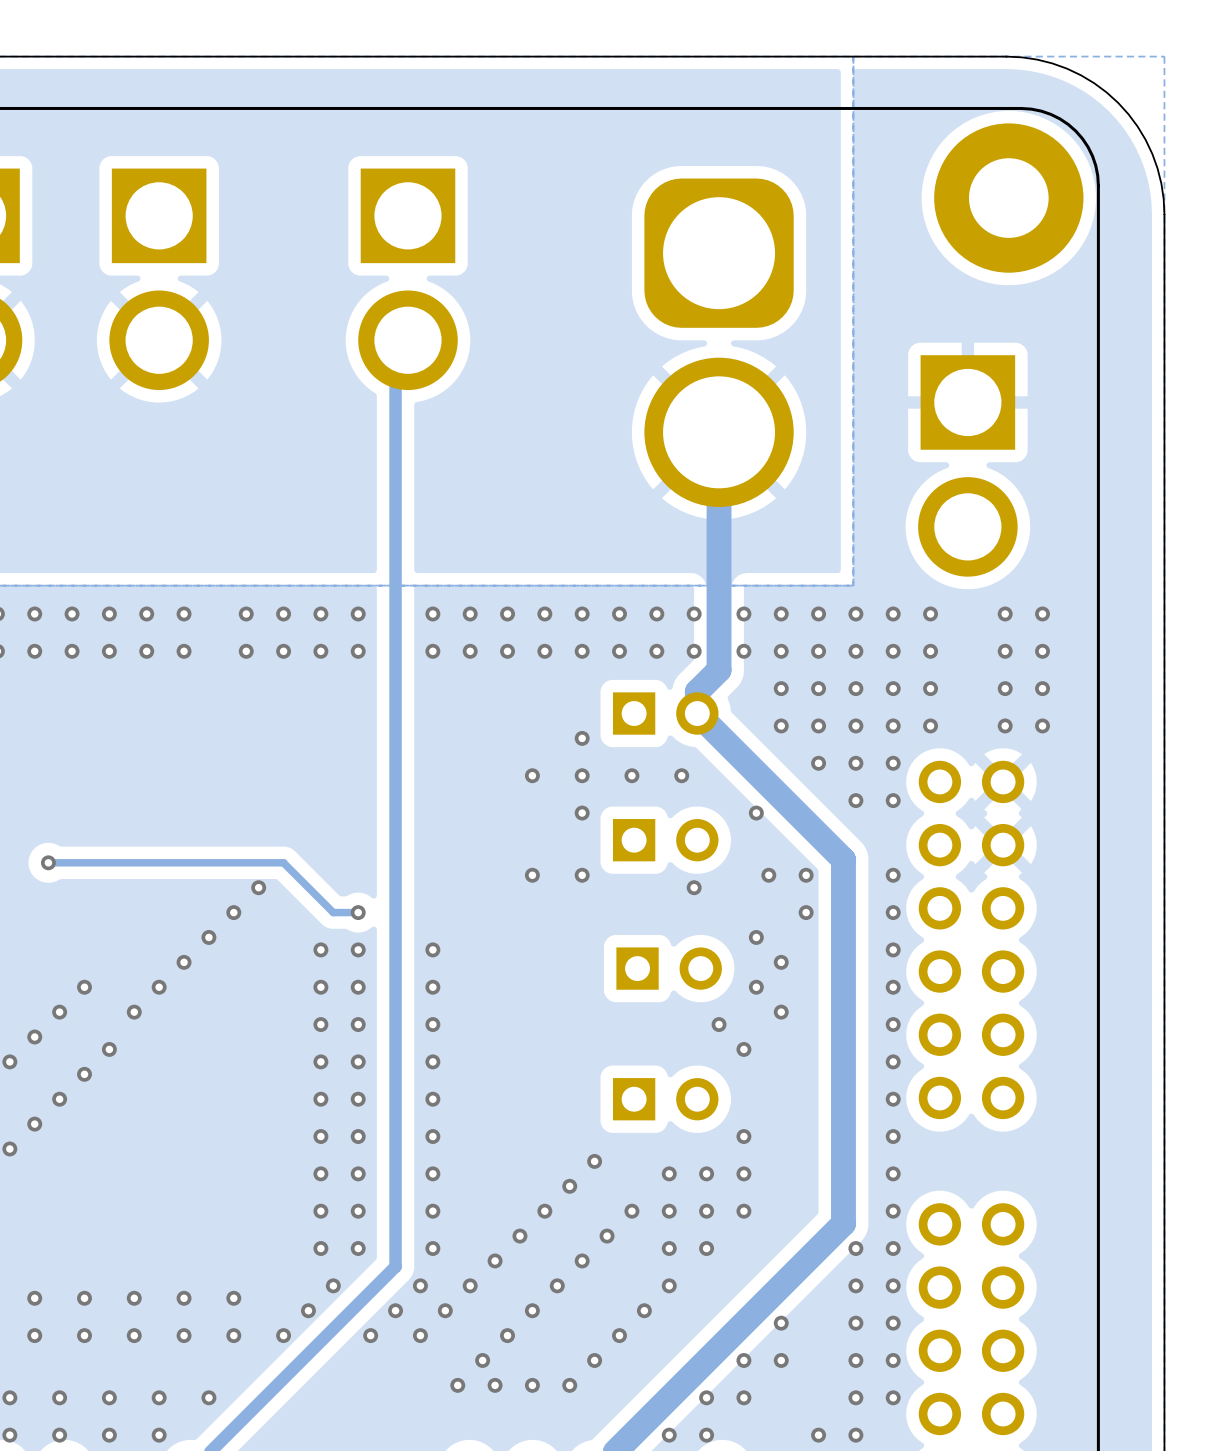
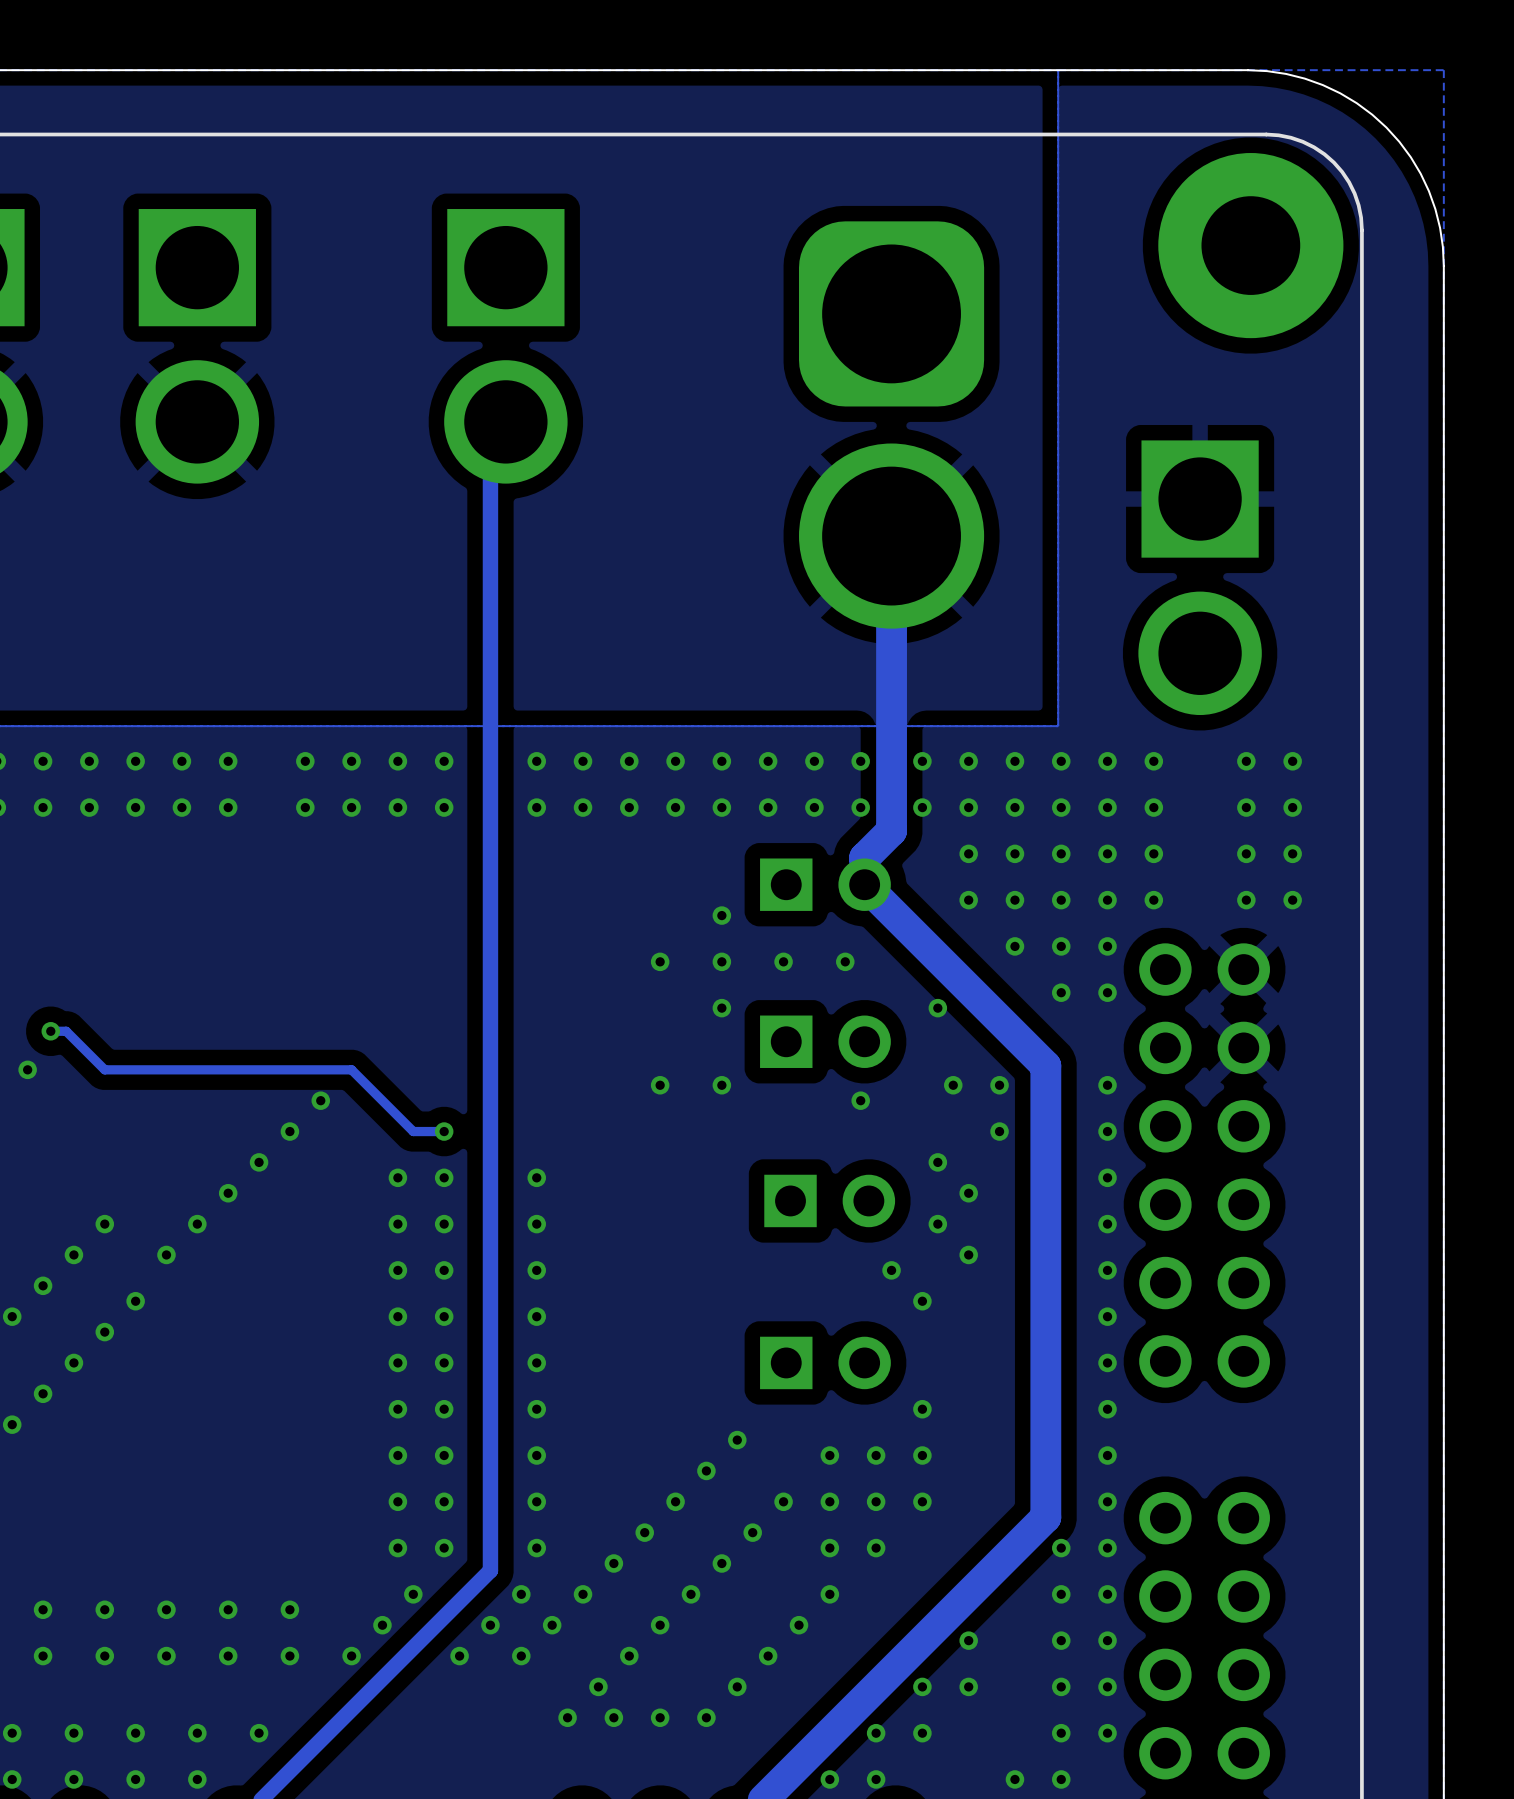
via: none -> (50, 1031)
via: none -> (27, 1069)
via: (48, 862) -> none
track: (84, 862) (48, 862) -> (104, 1069) (66, 1031) (50, 1031)

